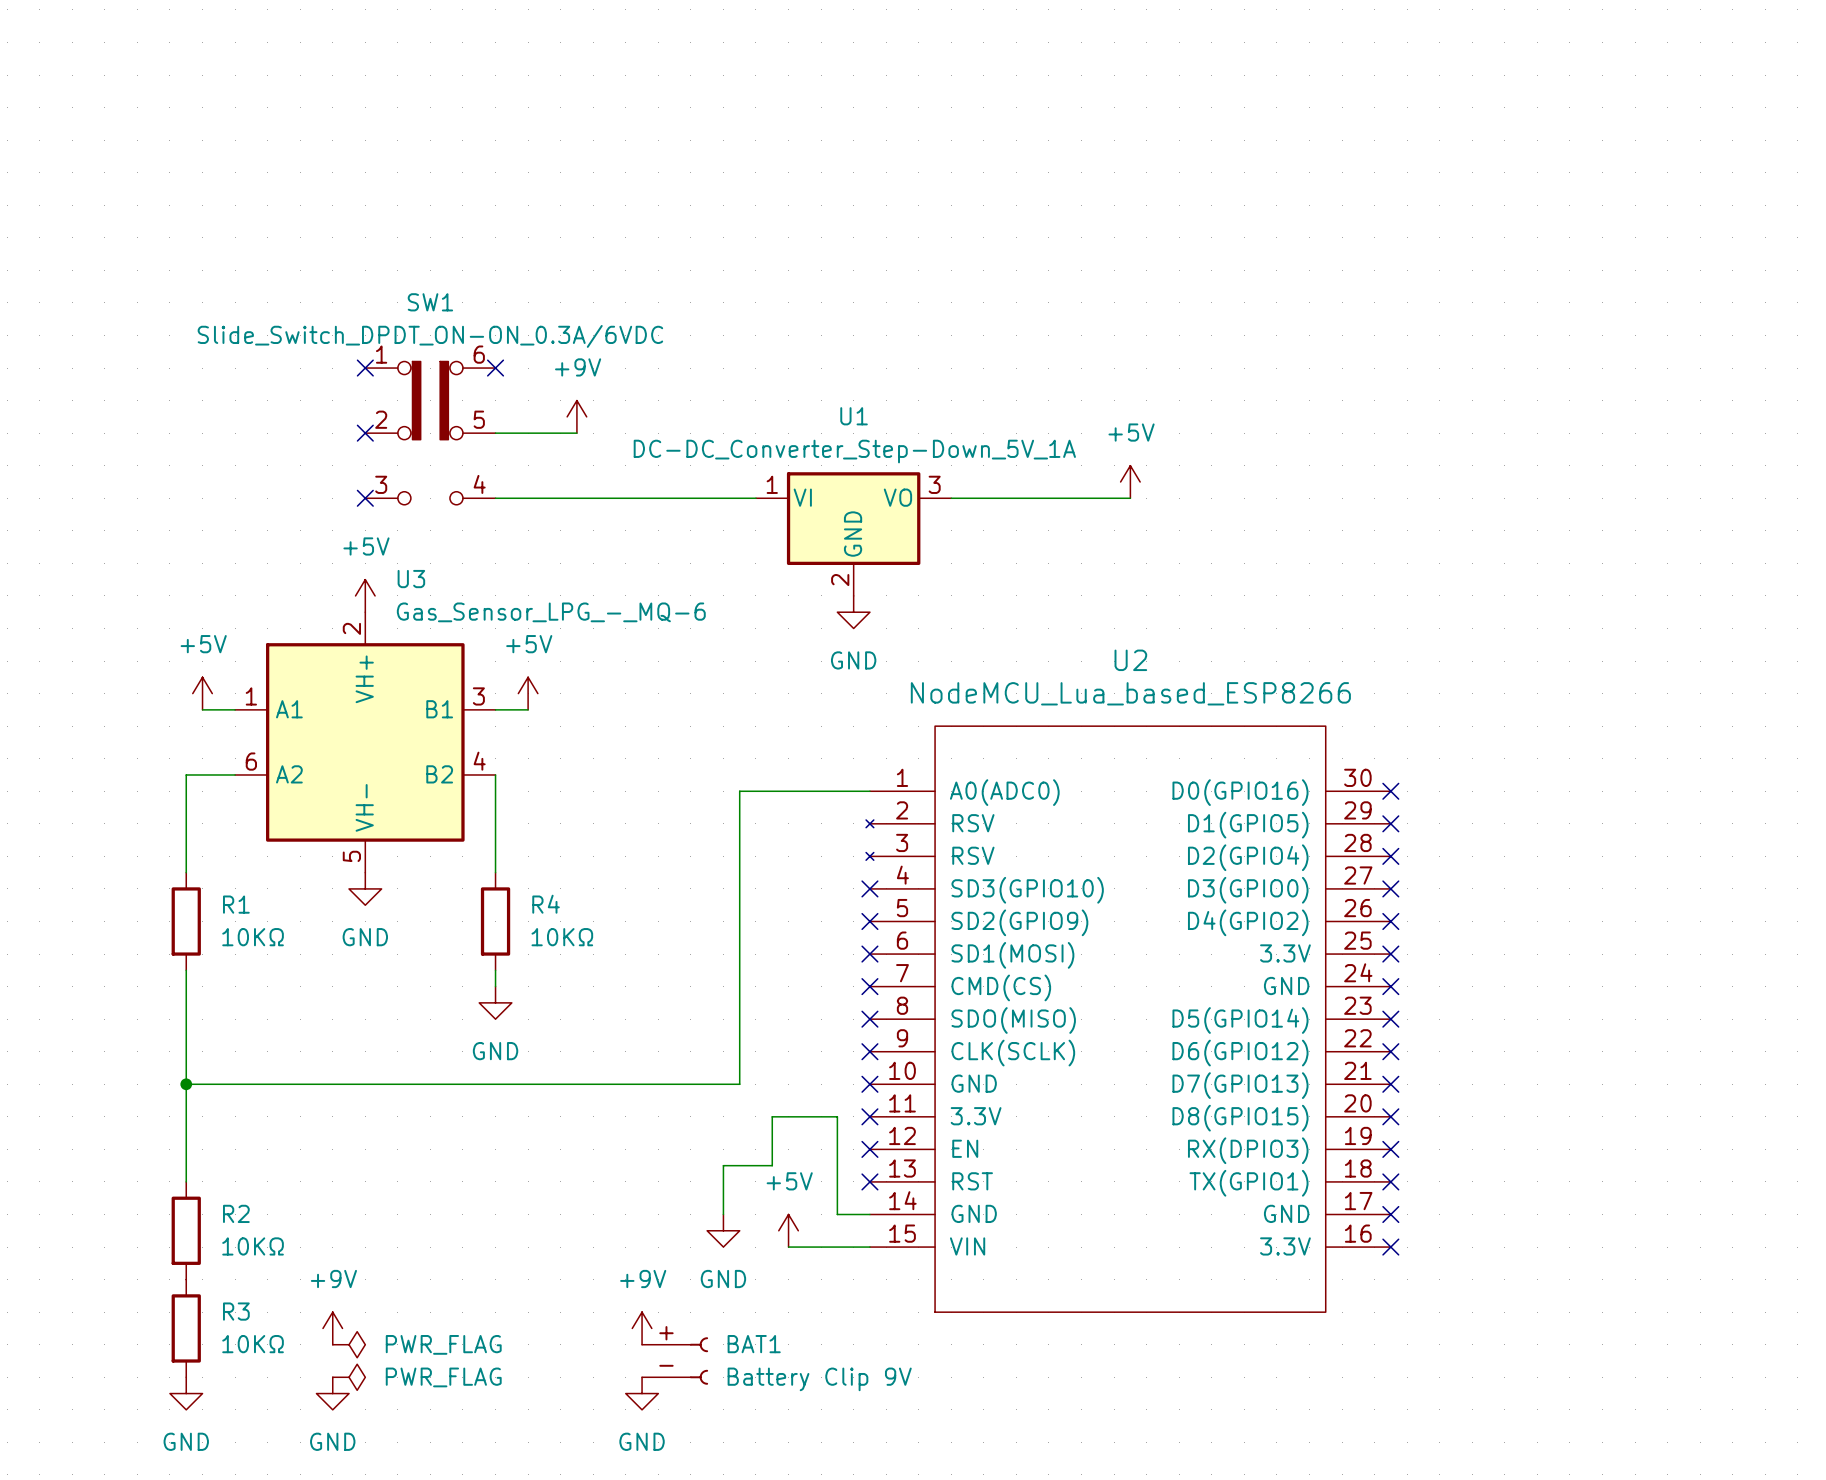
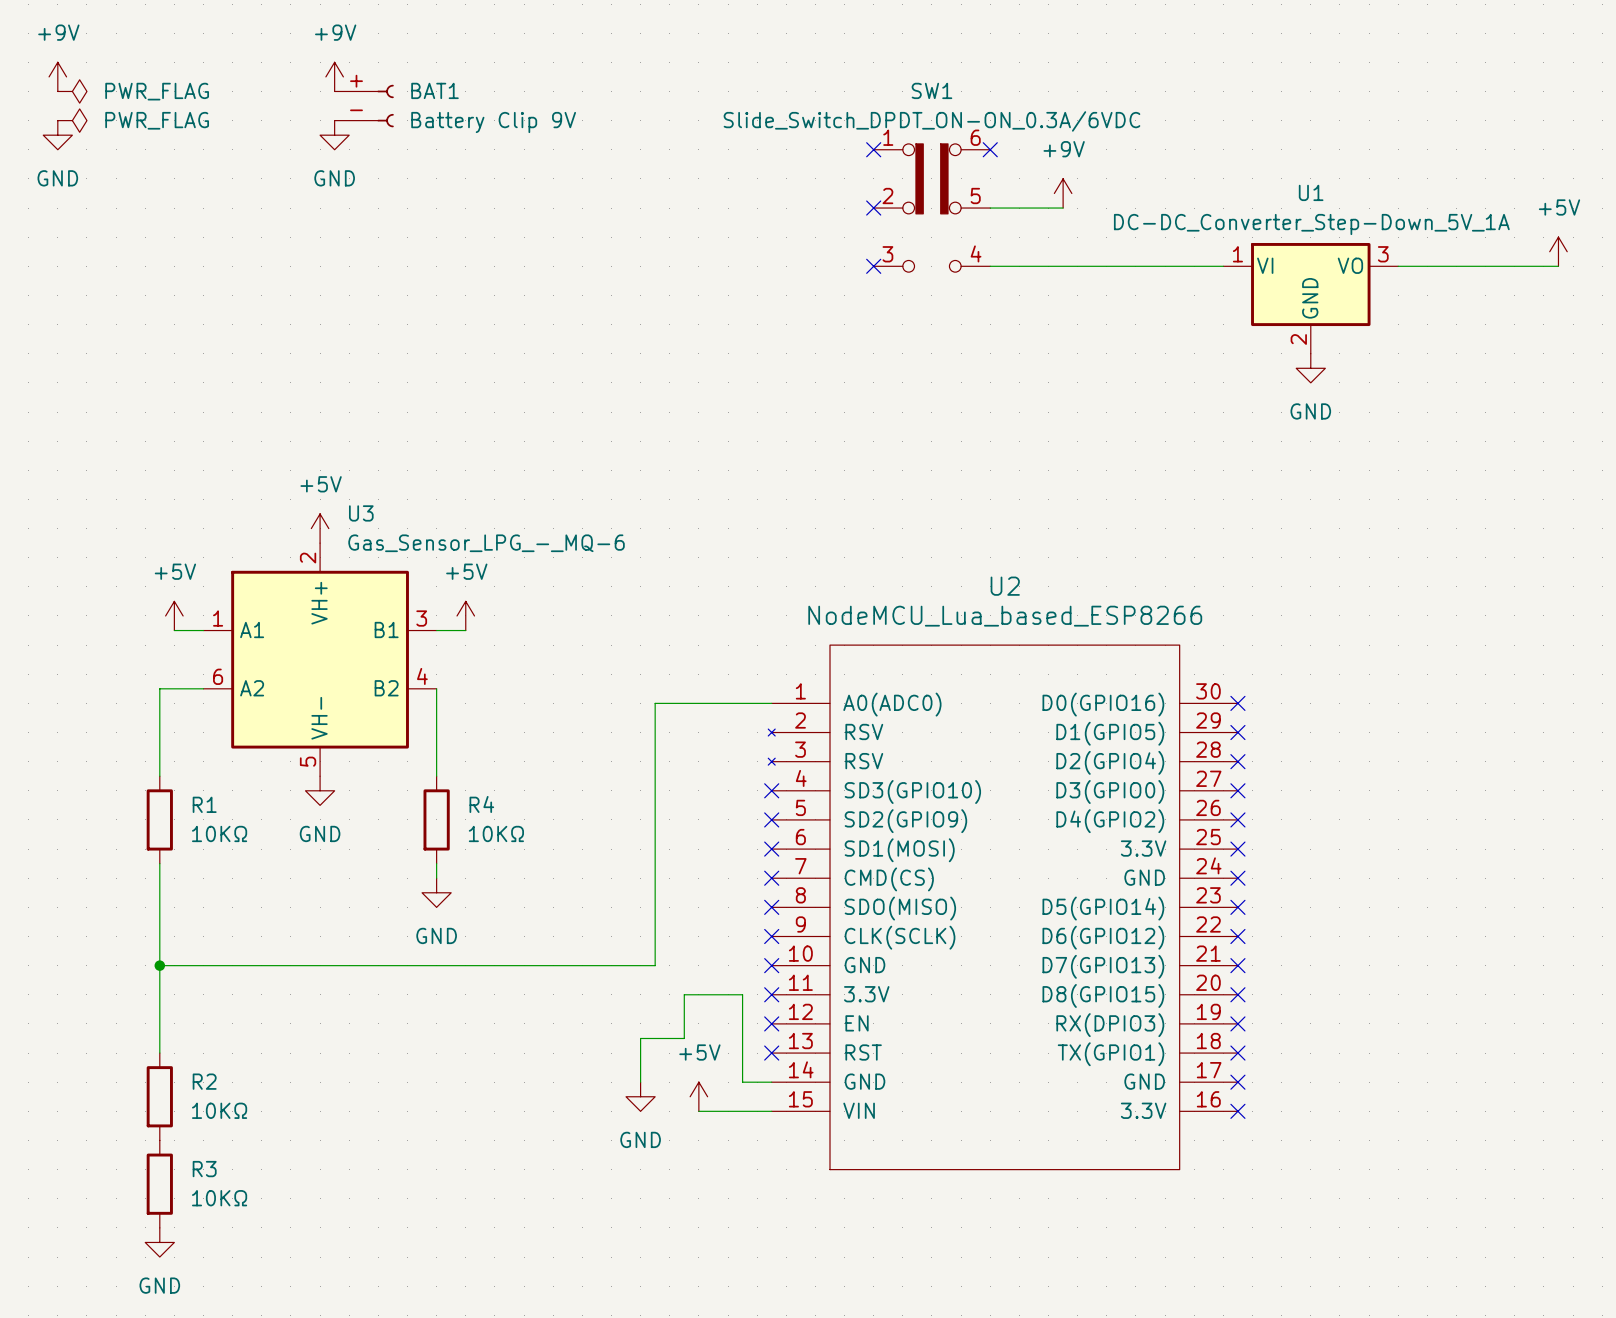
power symbol: none -> +9V (57, 76)
power symbol: none -> +9V (334, 76)
power symbol: none -> PWR_FLAG (72, 91)
power symbol: none -> PWR_FLAG (72, 120)
power symbol: none -> GND (57, 135)
power symbol: none -> GND (334, 135)
no-connect mark: none -> (873, 149)
no-connect mark: none -> (990, 149)
power symbol: none -> +9V (1063, 193)
no-connect mark: none -> (873, 208)
wire: none -> (990, 208) (1063, 208)
power symbol: none -> +5V (1558, 251)
no-connect mark: none -> (873, 266)
wire: none -> (990, 266) (1223, 266)
wire: none -> (1398, 266) (1558, 266)
no-connect mark: (365, 368) -> none
no-connect mark: (495, 368) -> none
power symbol: +9V (576, 416) -> none
power symbol: none -> GND (1310, 368)
no-connect mark: (365, 433) -> none
SW1 position: (430, 433) -> (931, 208)
wire: (495, 433) (576, 433) -> none
power symbol: +5V (1130, 481) -> none
no-connect mark: (365, 498) -> none
wire: (495, 498) (755, 498) -> none
wire: (951, 498) (1130, 498) -> none
U1 position: (853, 534) -> (1310, 298)
power symbol: GND (853, 612) -> none
power symbol: +9V (332, 1328) -> none
power symbol: +9V (642, 1328) -> none
power symbol: PWR_FLAG (349, 1344) -> none
BAT1 position: (675, 1361) -> (364, 106)
power symbol: PWR_FLAG (349, 1377) -> none
power symbol: GND (332, 1393) -> none
power symbol: GND (642, 1393) -> none

